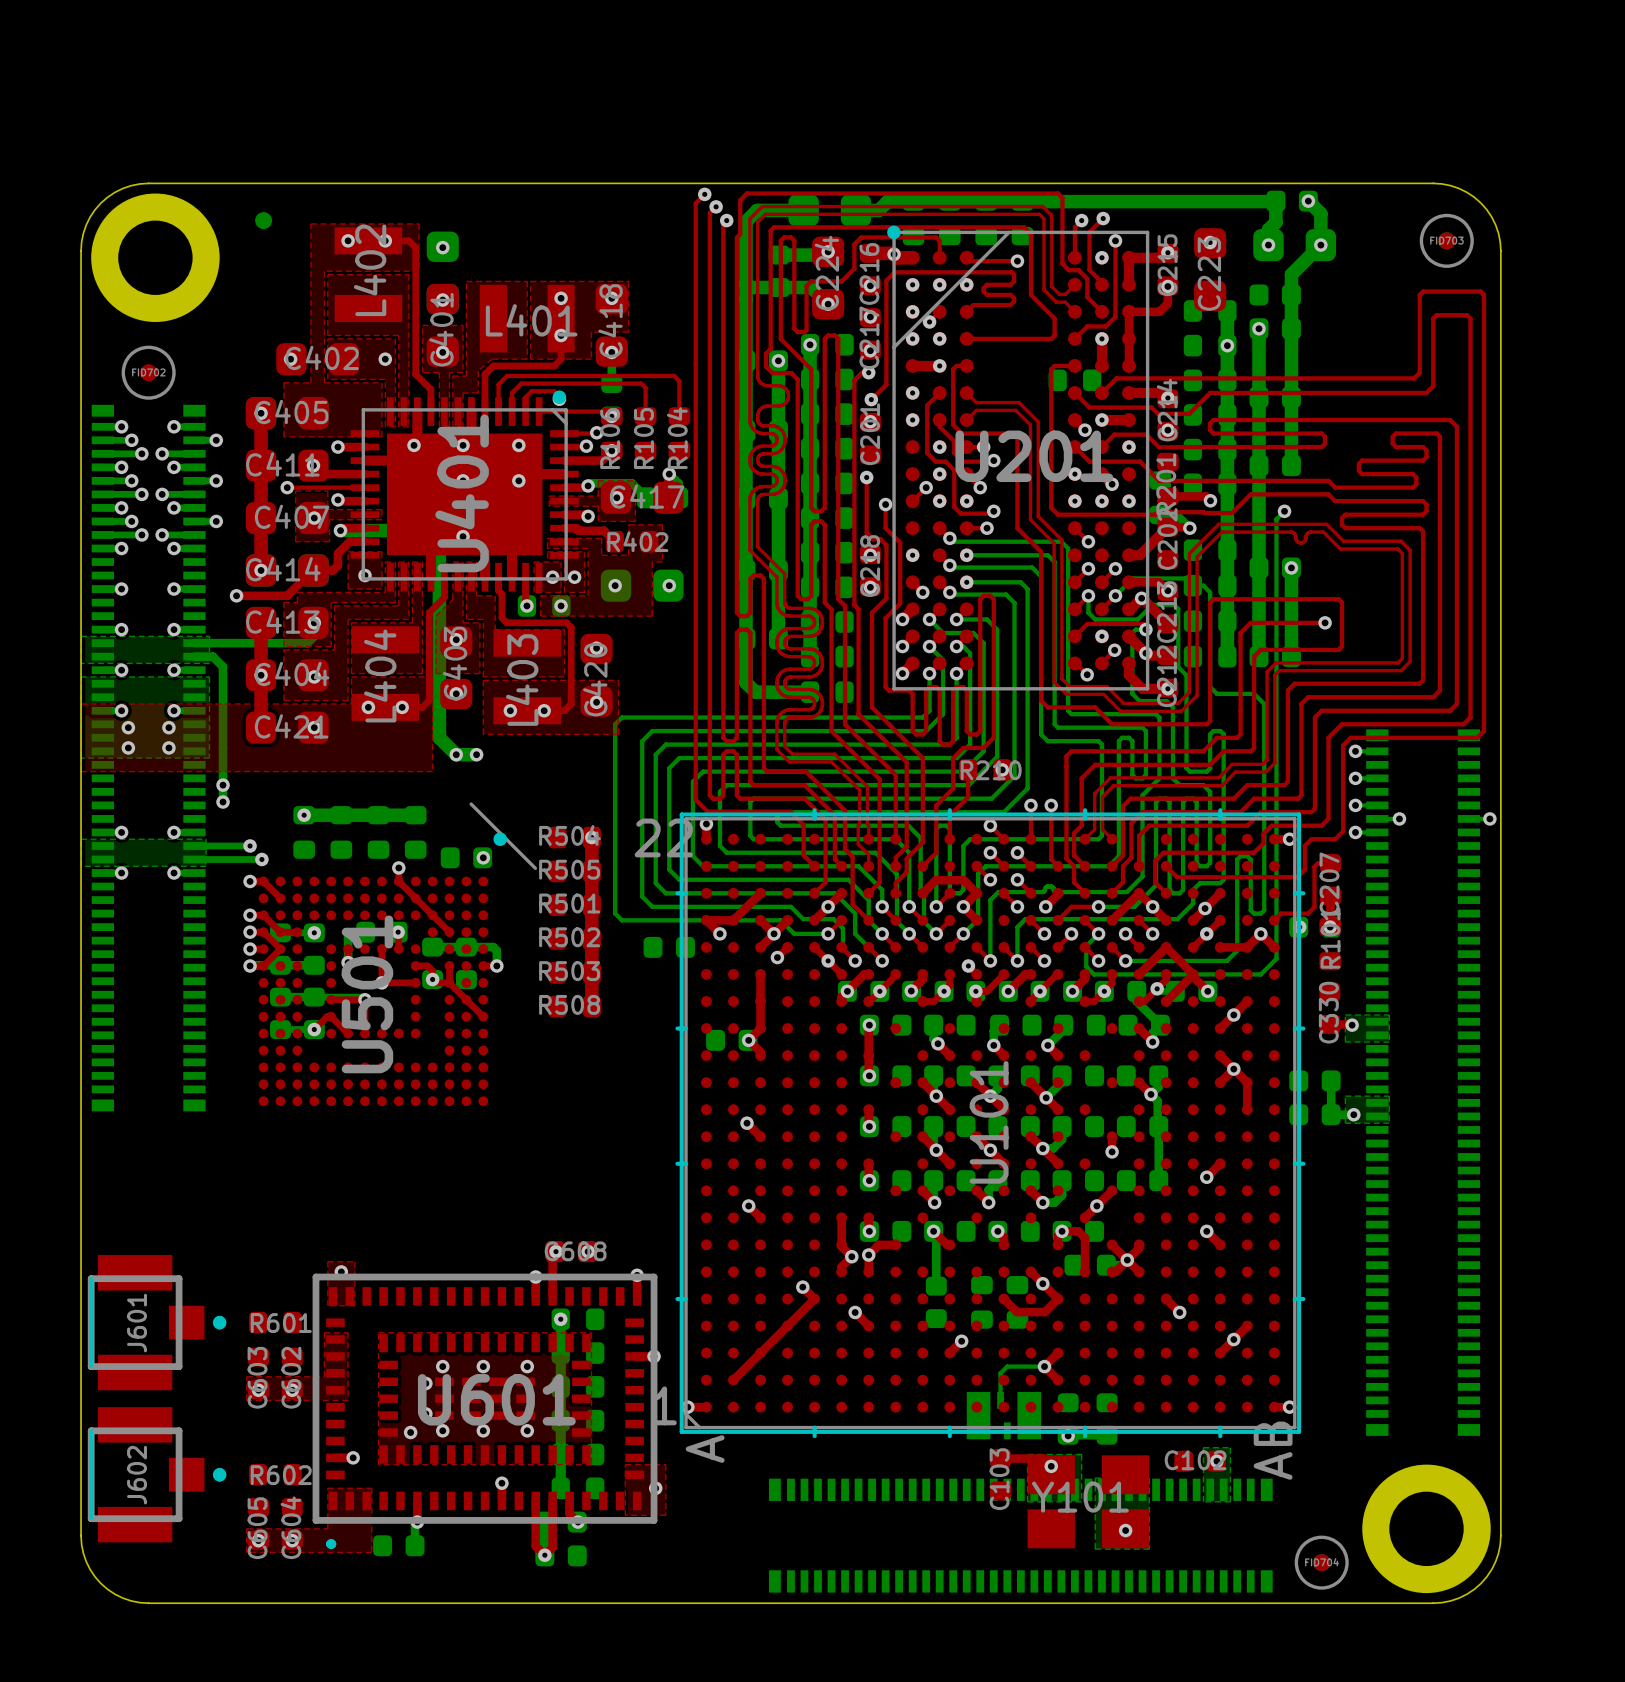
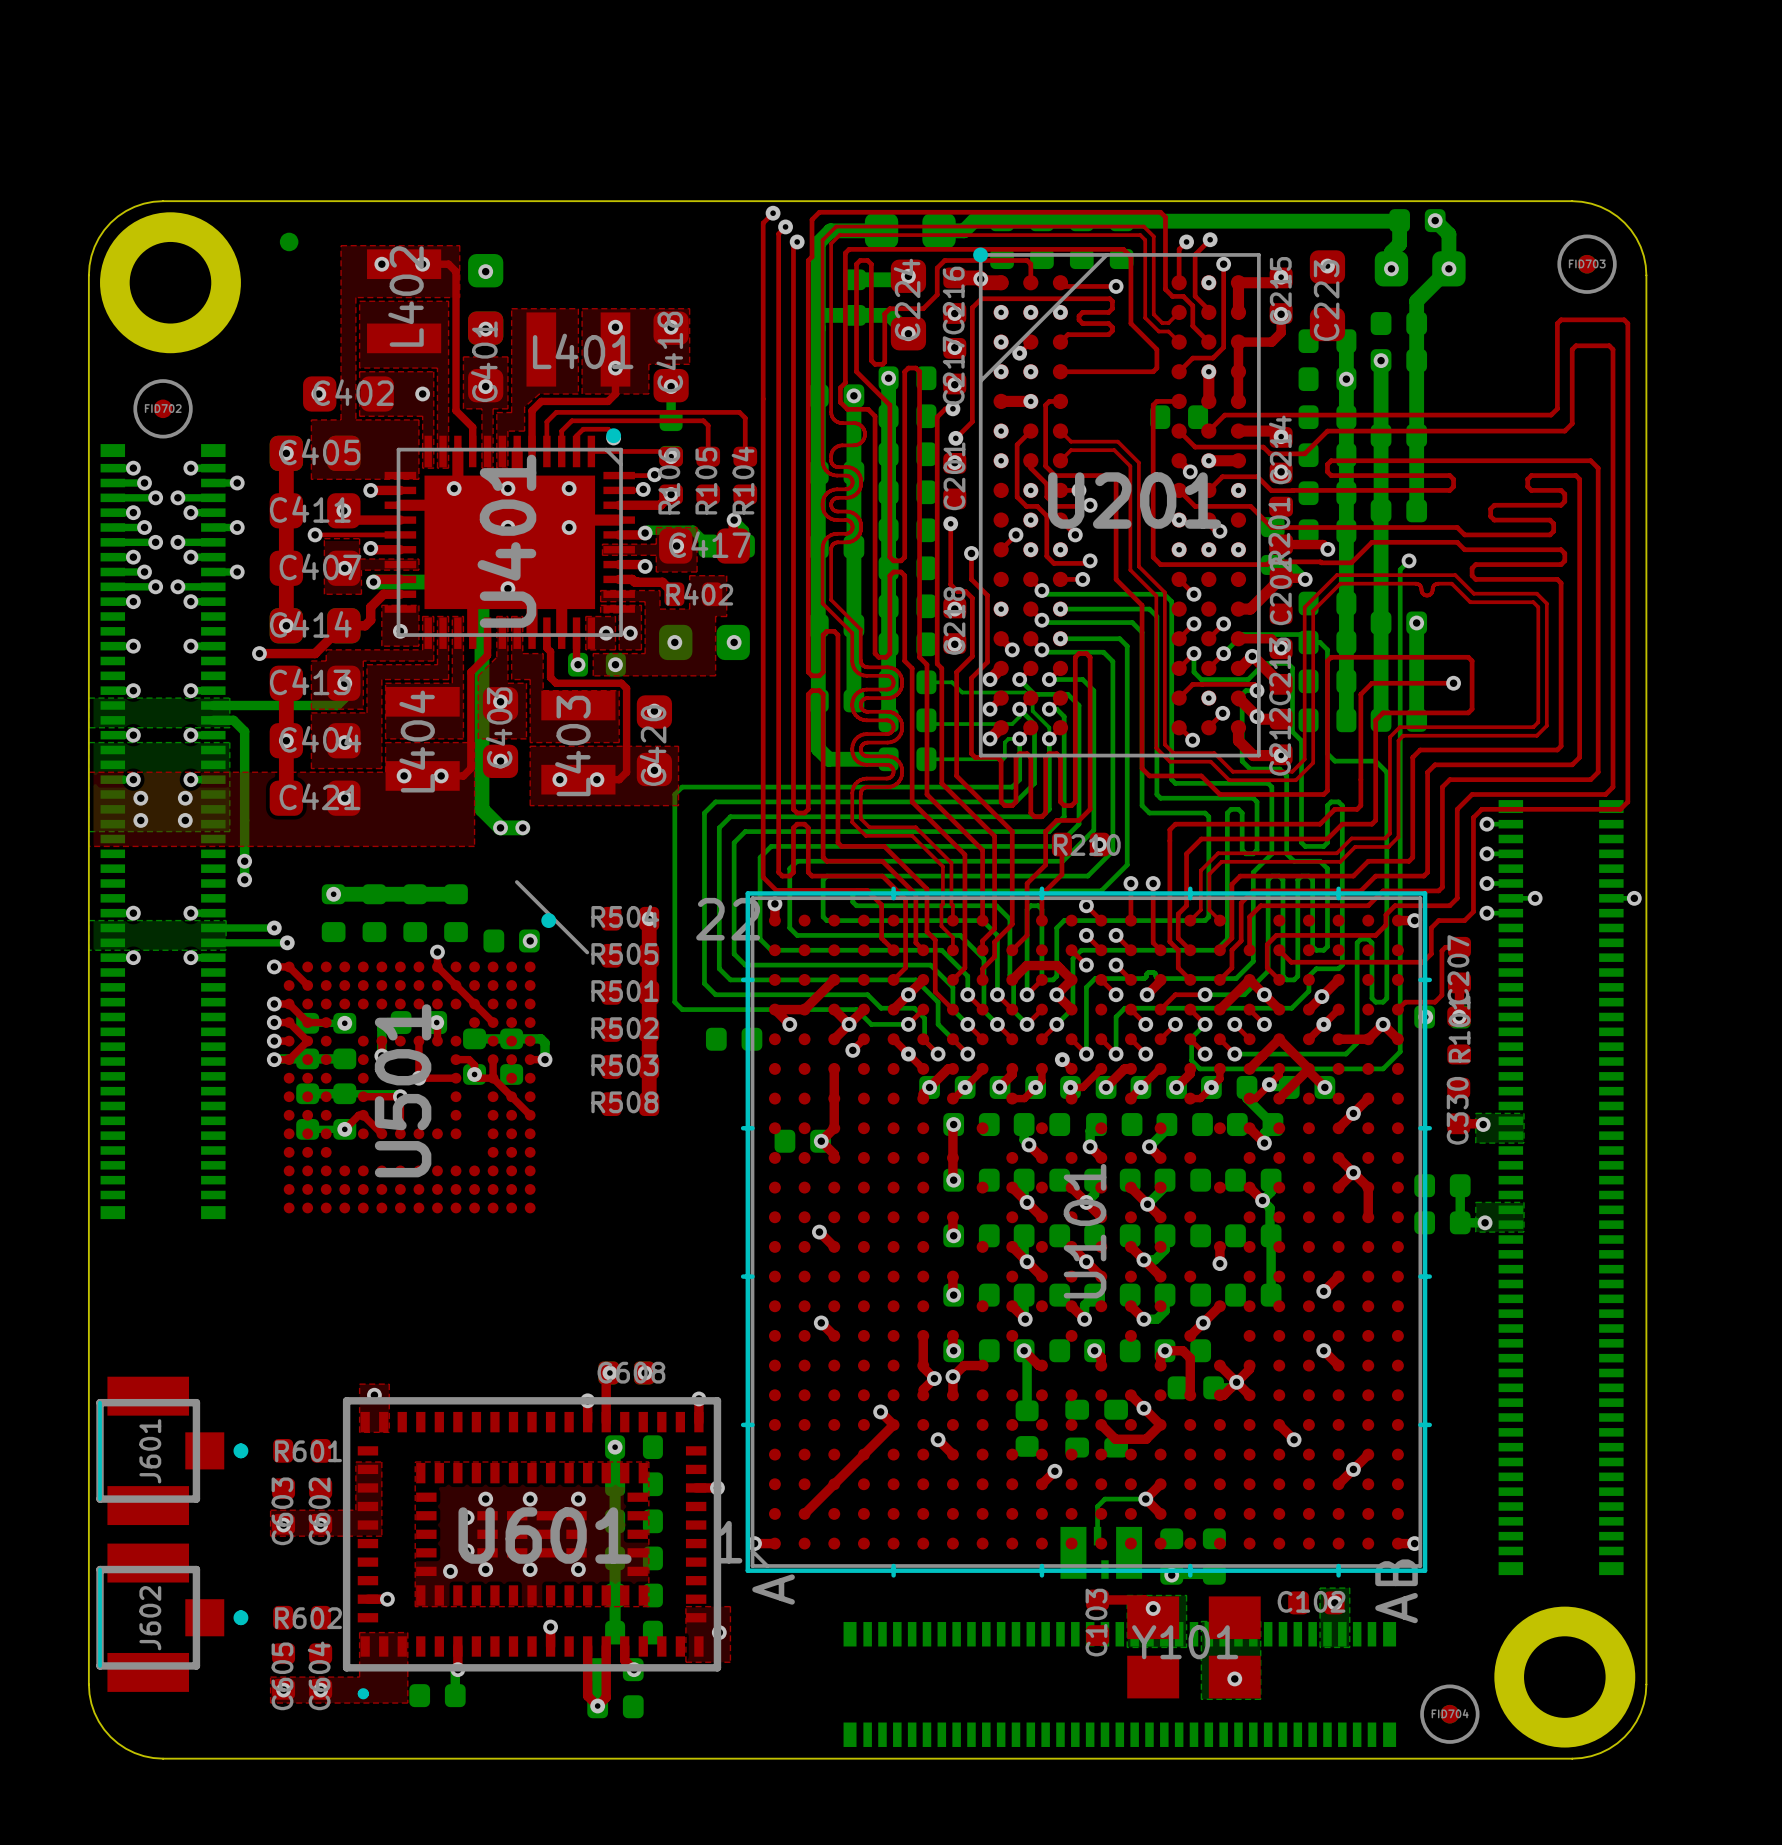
bottom track: none -> (926, 682) (952, 682) (962, 692) (1025, 692) (1032, 700) (1032, 710) (1049, 727) (1049, 738)
bottom track: none -> (1019, 709) (1019, 716) (1012, 724) (930, 724) (926, 720)
bottom track: none -> (1019, 738) (1008, 738) (1004, 742) (1004, 757) (1002, 759) (926, 759)

